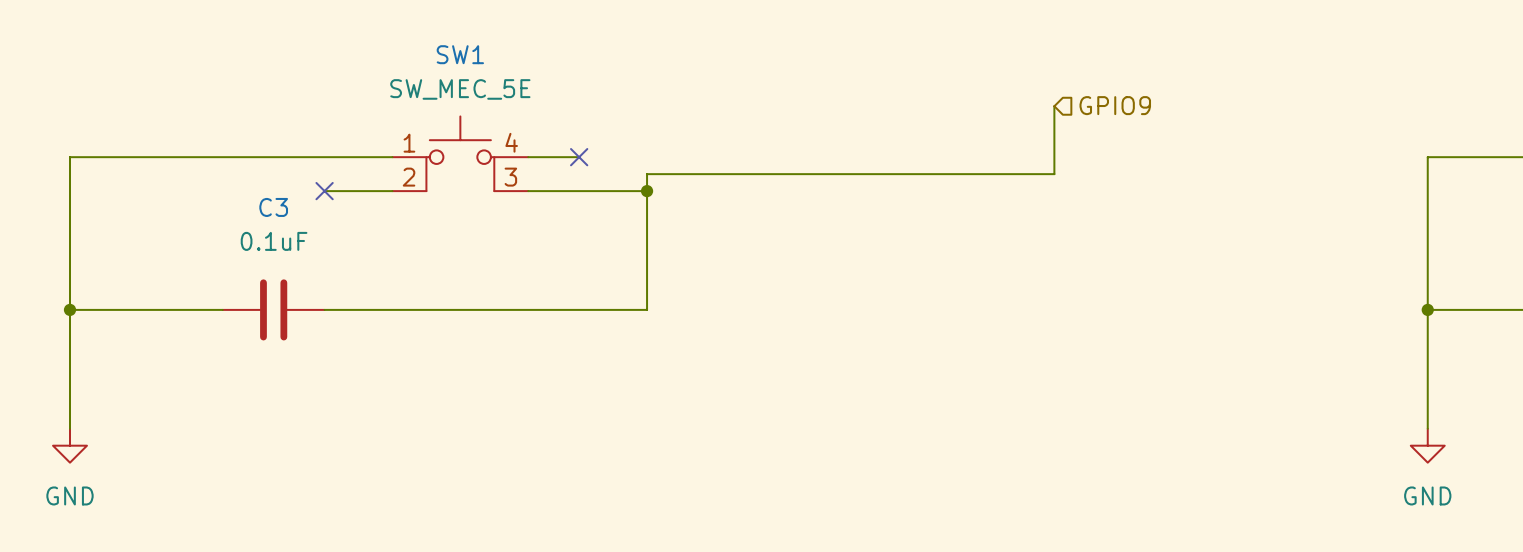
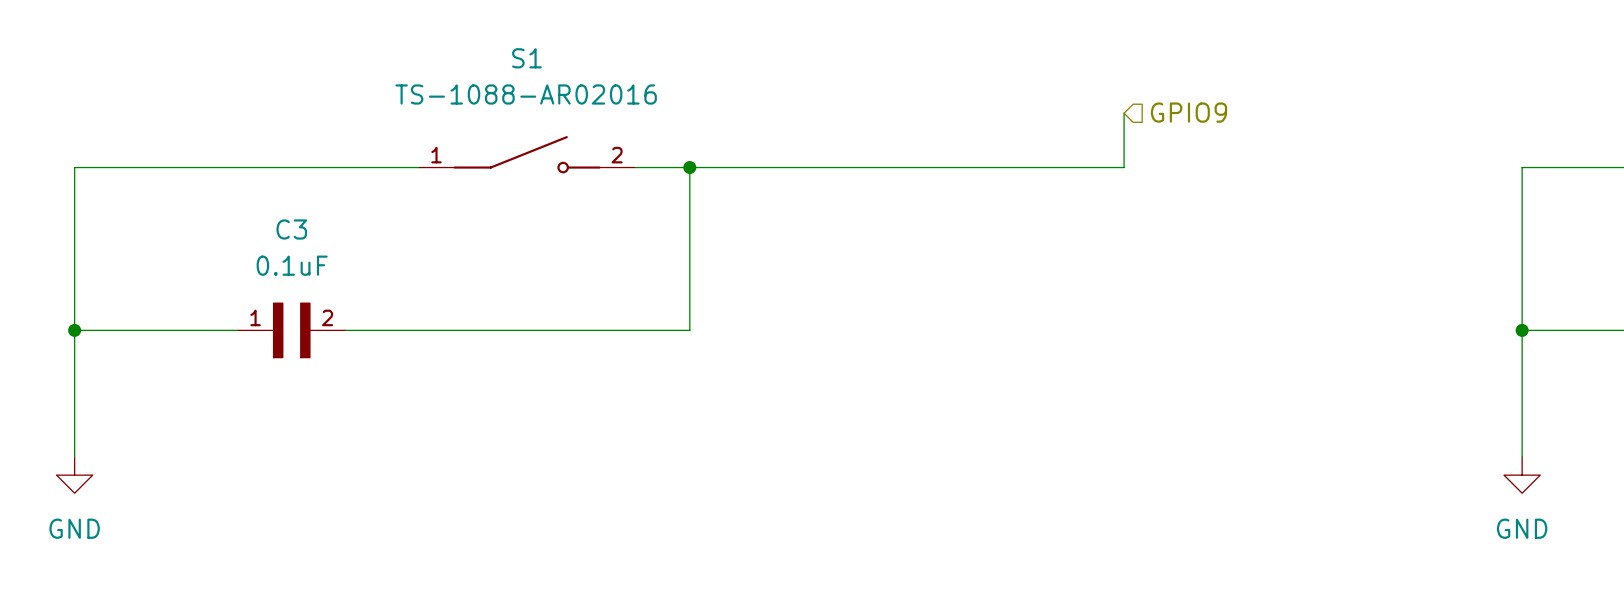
S1: none -> TS-1088-AR02016 (526, 154)
SW1: SW_MEC_5E (460, 153) -> none
no-connect mark: (579, 157) -> none
wire: none -> (689, 167) (689, 185)
wire: (1054, 157) (1054, 174) (647, 174) -> (1124, 167) (635, 167)
wire: (324, 191) (392, 191) -> none
no-connect mark: (324, 191) -> none
wire: (528, 191) (647, 191) -> none
junction position: (647, 191) -> (689, 167)
C3 symbol: [222, 279, 325, 341] -> [237, 302, 347, 359]

